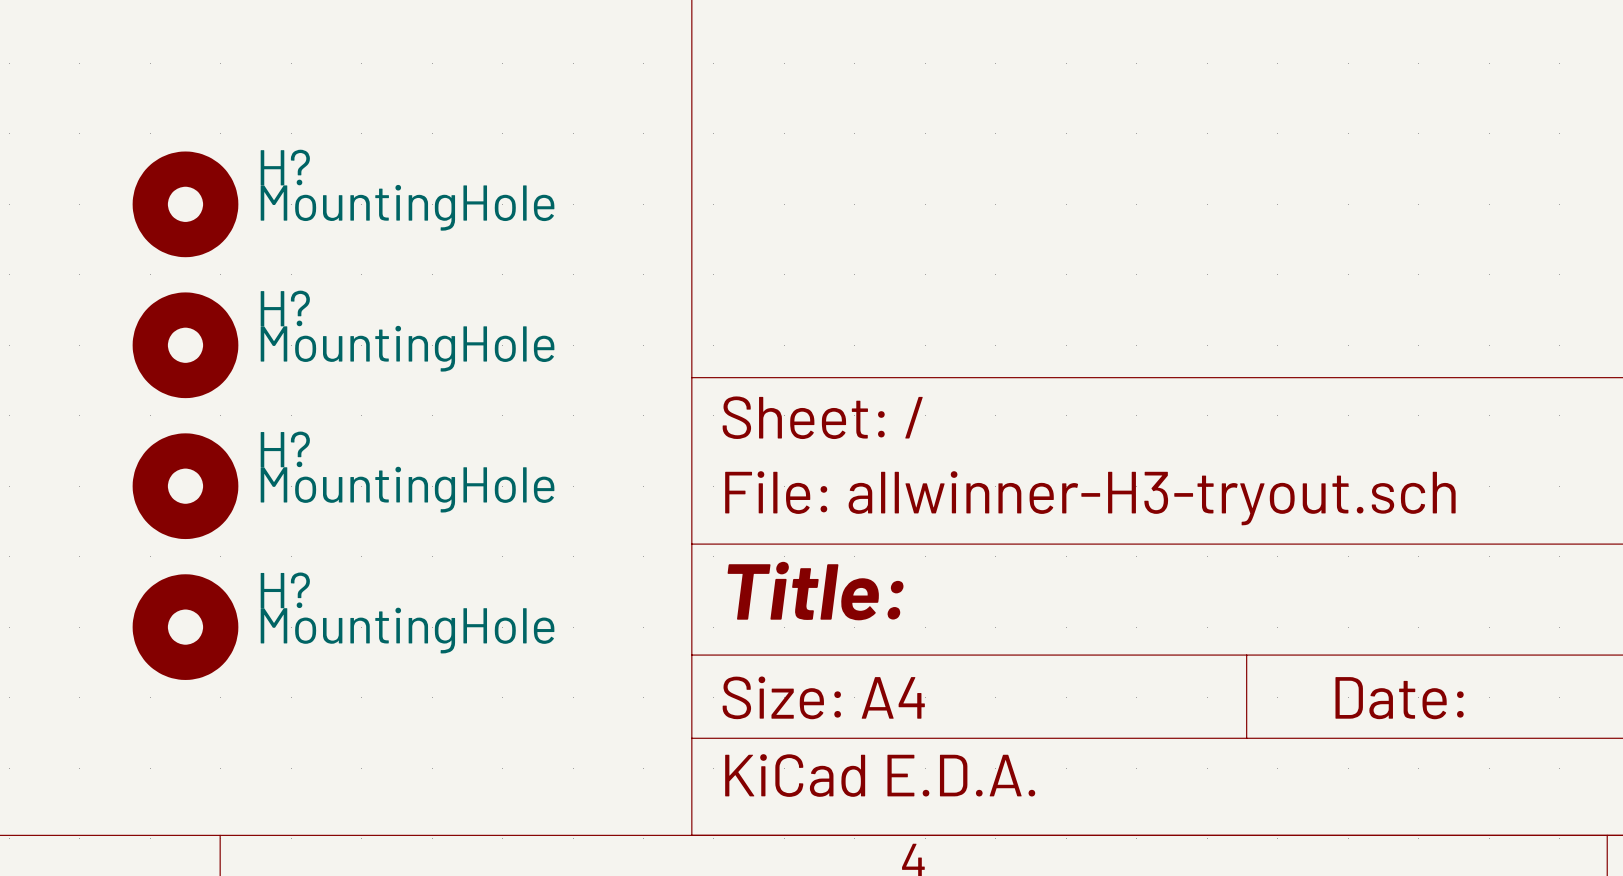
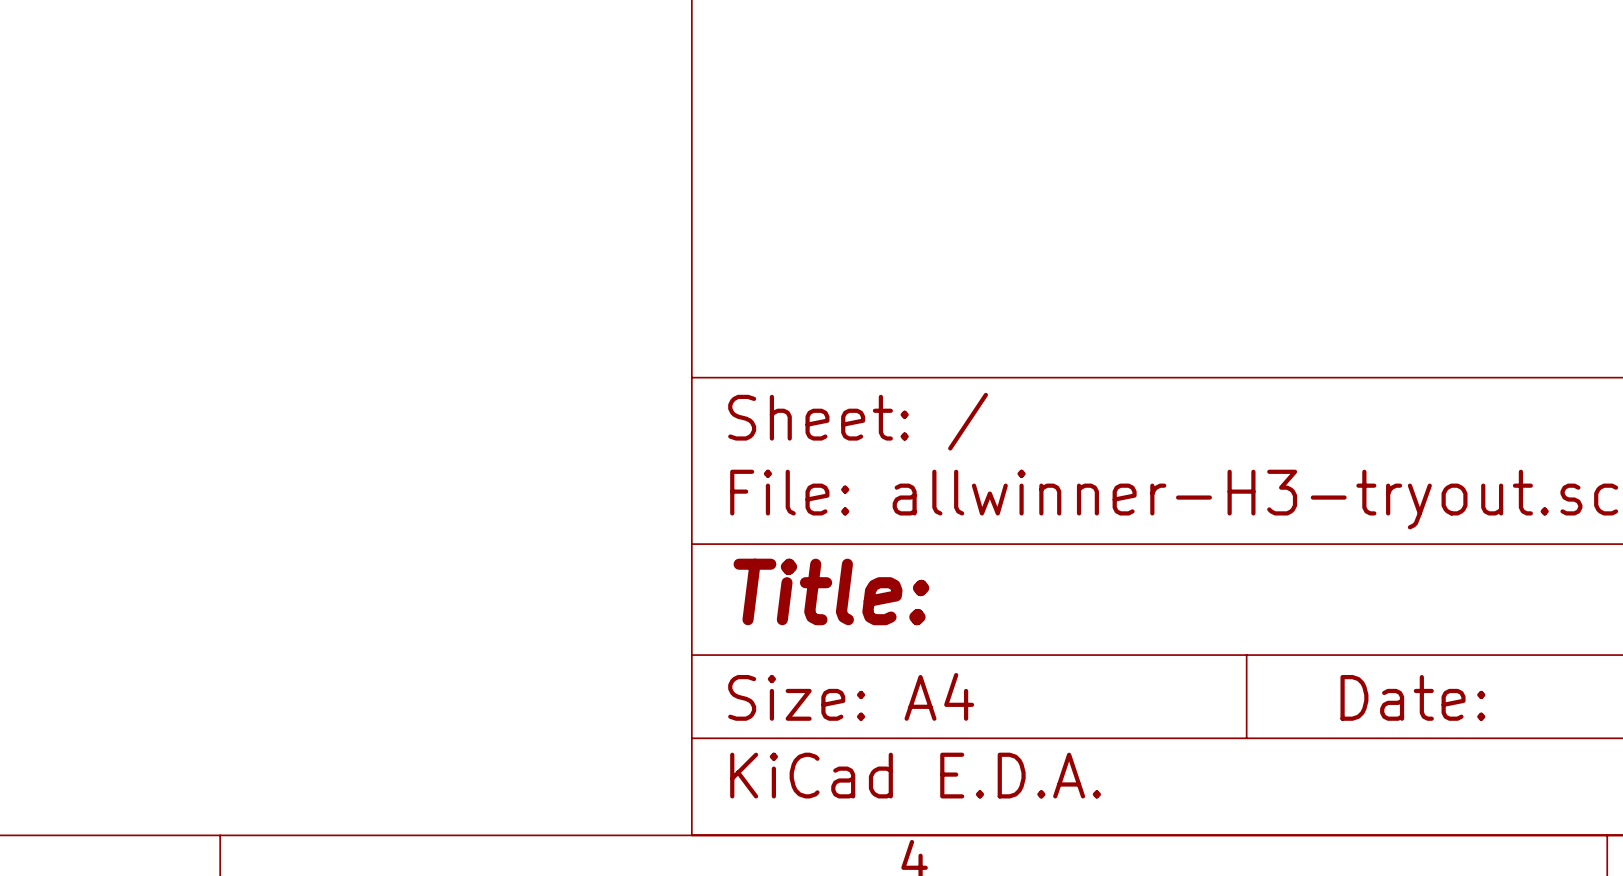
H?: MountingHole (185, 204) -> none
H?: MountingHole (185, 345) -> none
H?: MountingHole (185, 486) -> none
H?: MountingHole (185, 627) -> none

